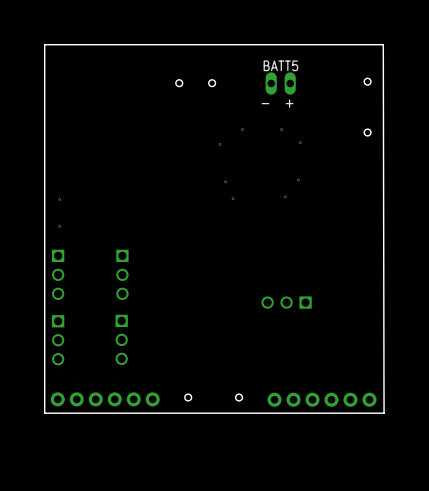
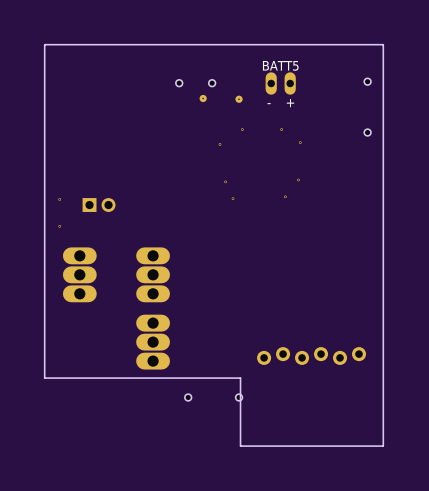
board edge: (383, 44) (384, 413) (44, 413) (44, 378) -> (383, 44) (383, 446) (240, 446) (240, 378) (44, 378)
part: none -> (203, 98)
part: none -> (239, 99)
part: none -> (99, 205)
part: (58, 274) -> none
part: none -> (79, 274)
part: (122, 274) -> none
part: none -> (153, 274)
part: (286, 302) -> none
part: (121, 339) -> none
part: (58, 340) -> none
part: none -> (153, 342)
part: none -> (311, 356)
part: (105, 399) -> none
part: (322, 399) -> none

